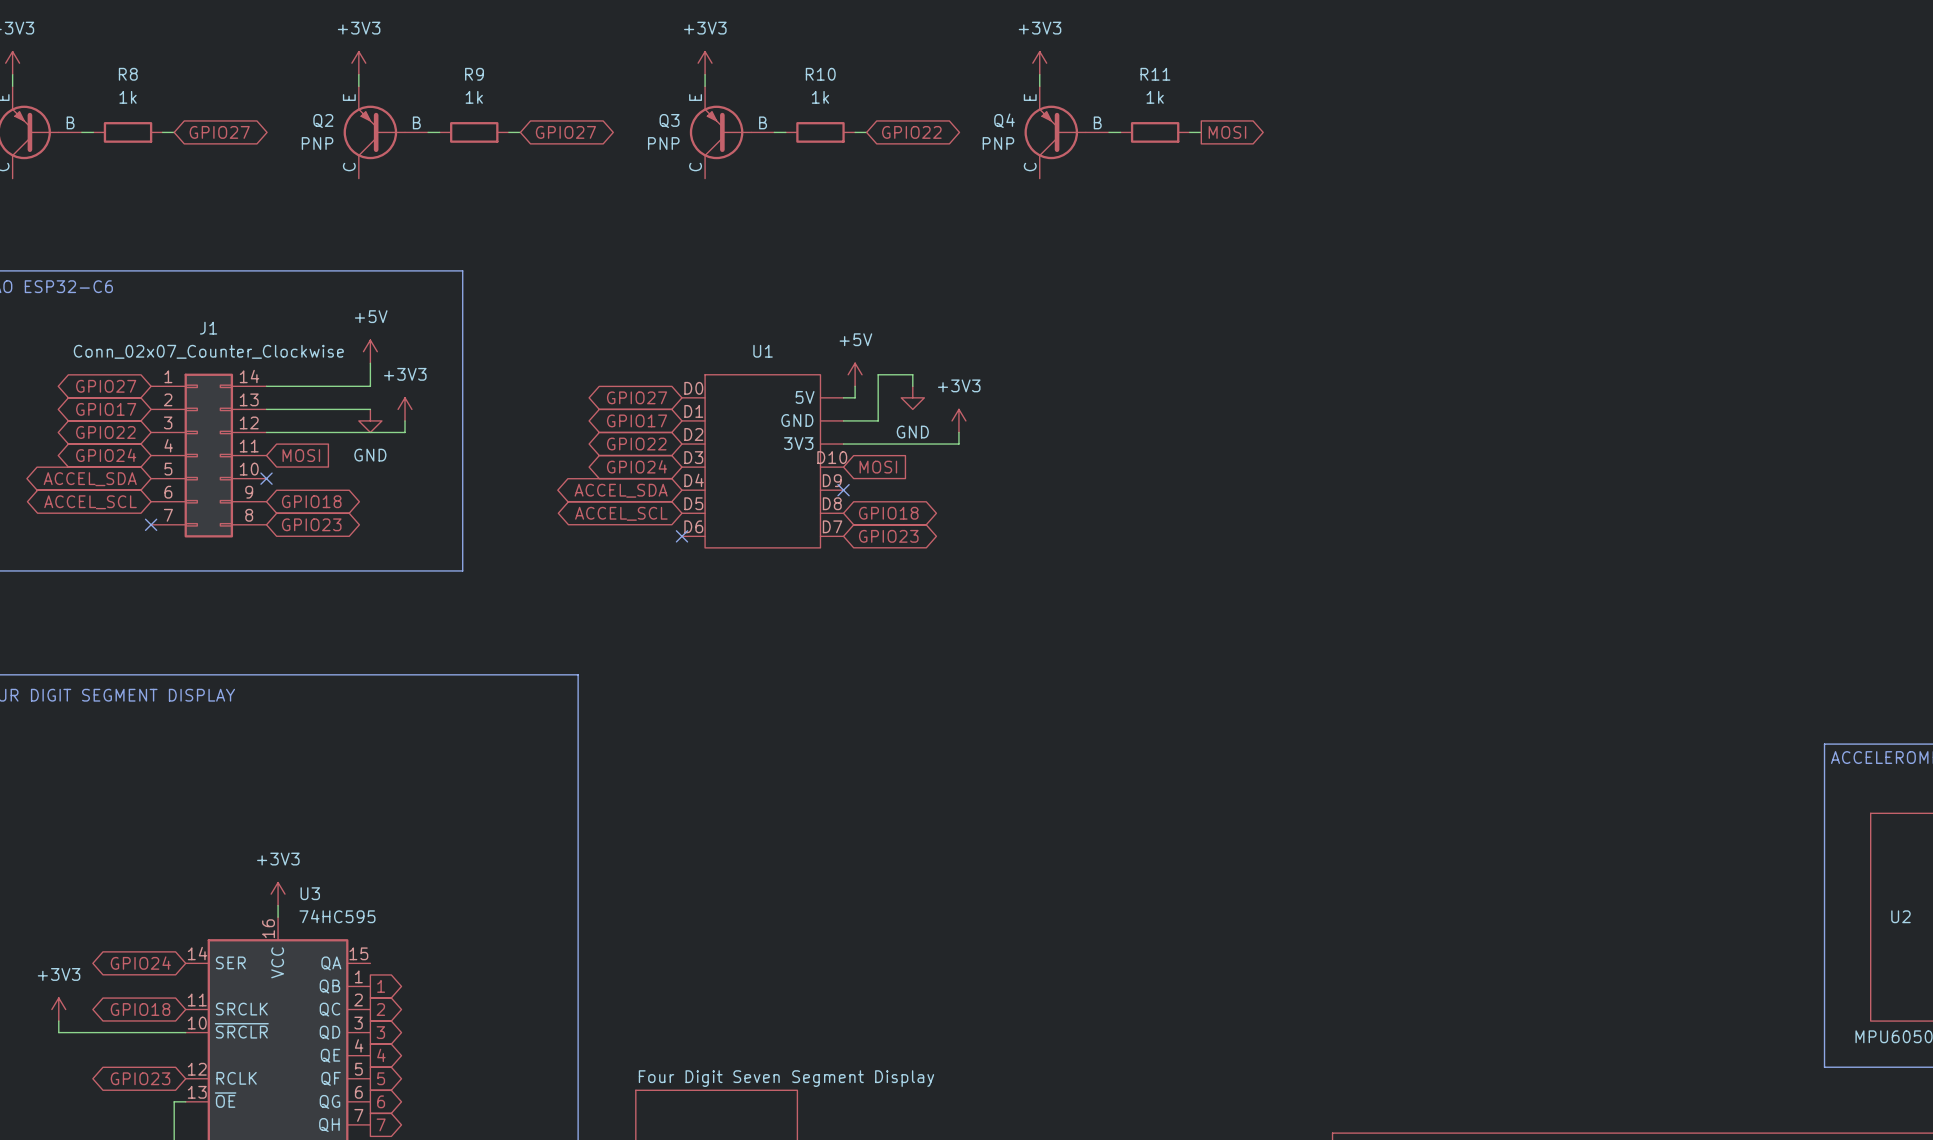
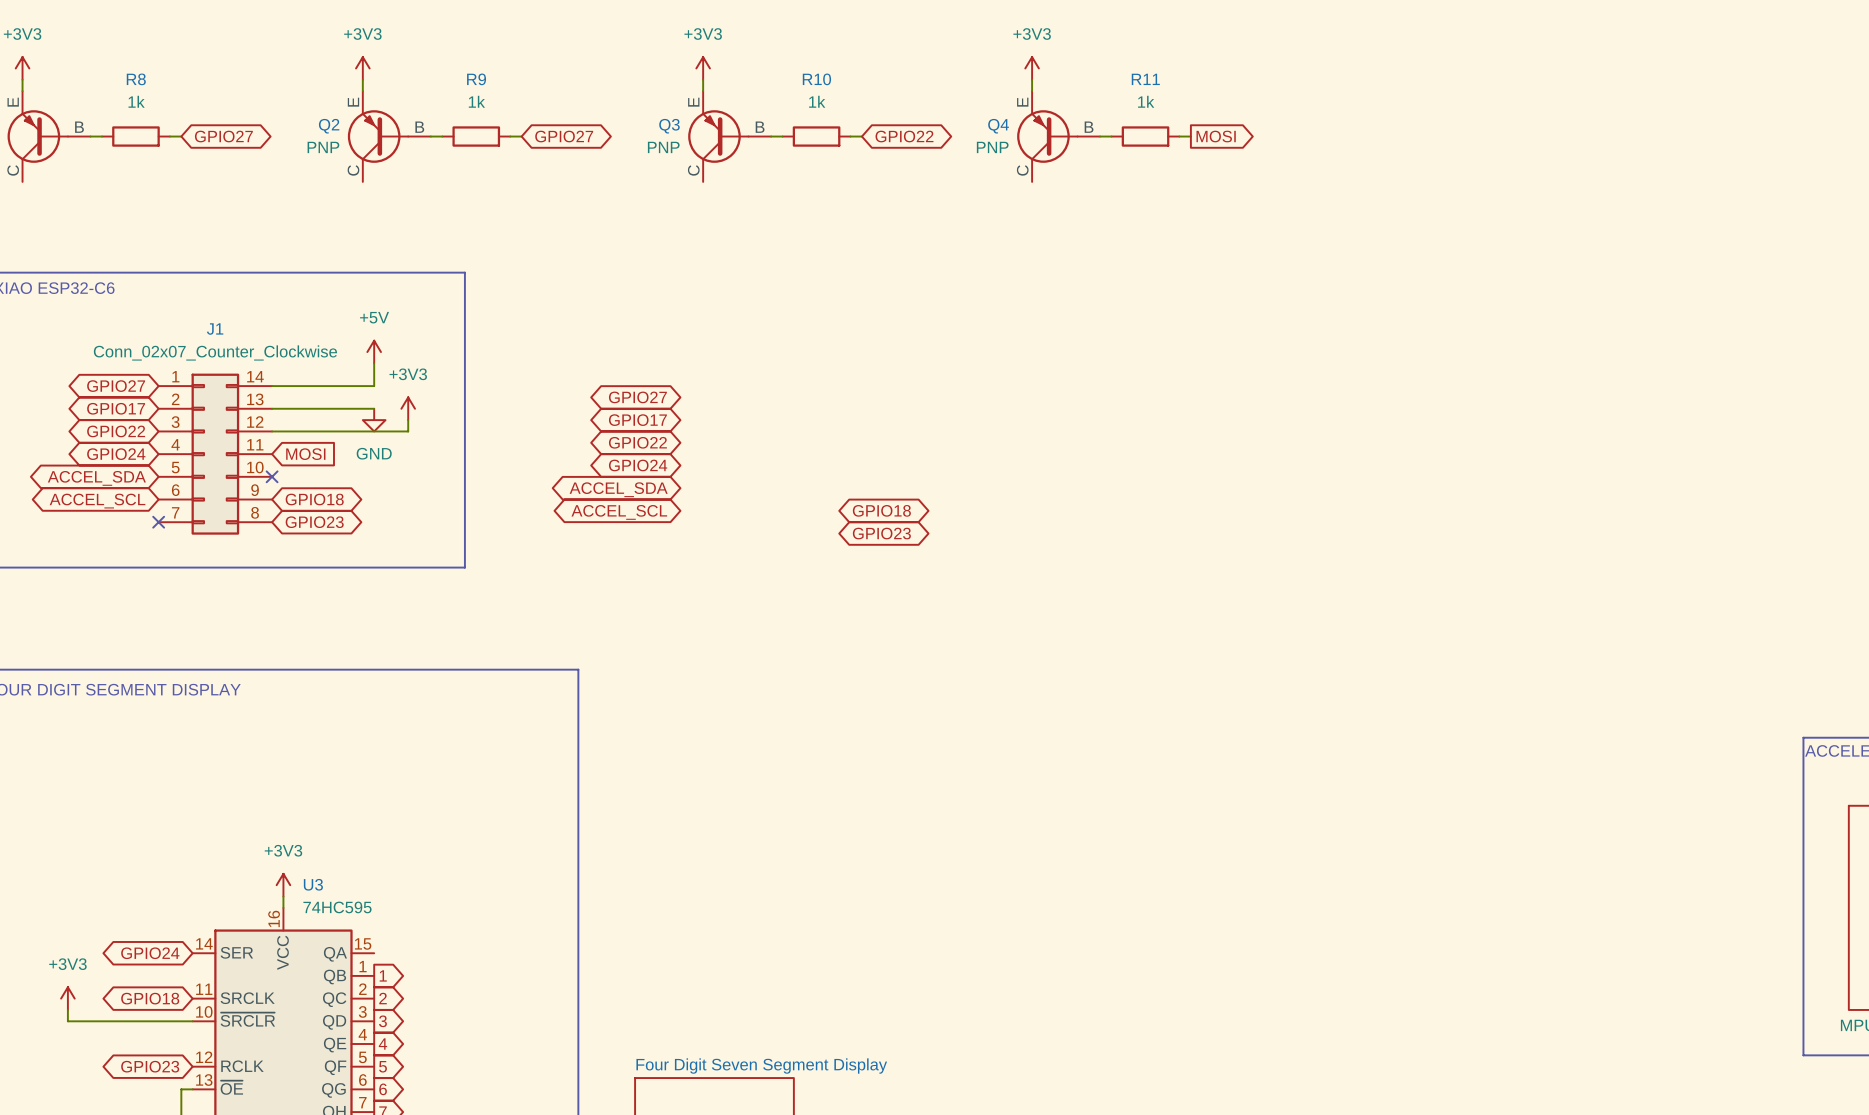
power symbol: +5V (855, 374) -> none
wire: (855, 386) (855, 397) (843, 397) -> none
wire: (912, 386) (912, 374) (878, 374) (878, 420) (843, 420) -> none
power symbol: GND (912, 397) -> none
power symbol: +3V3 (958, 420) -> none
wire: (958, 432) (958, 444) (843, 444) -> none
U1: (762, 461) -> none
global label: MOSI (878, 467) -> none
no-connect mark: (843, 490) -> none
no-connect mark: (681, 536) -> none

